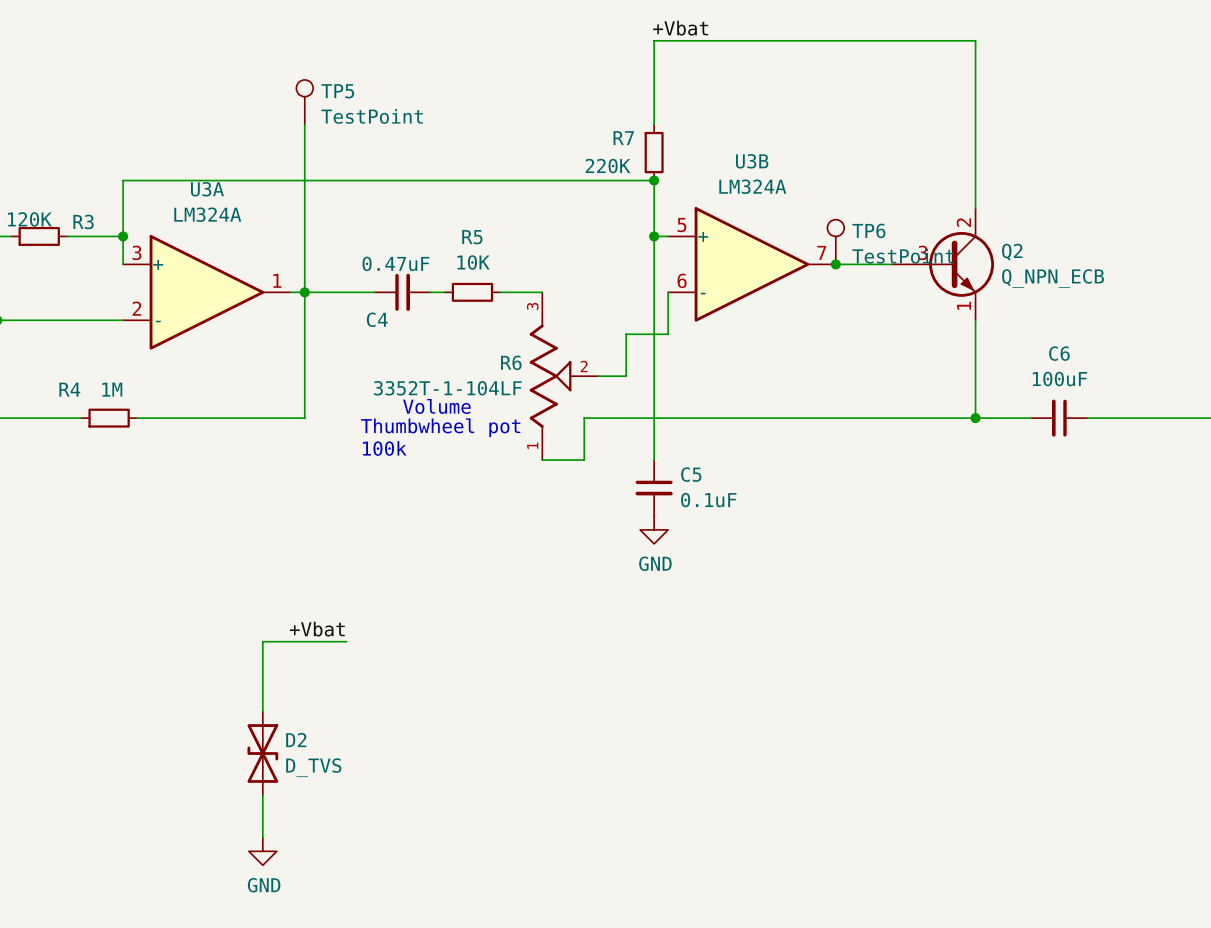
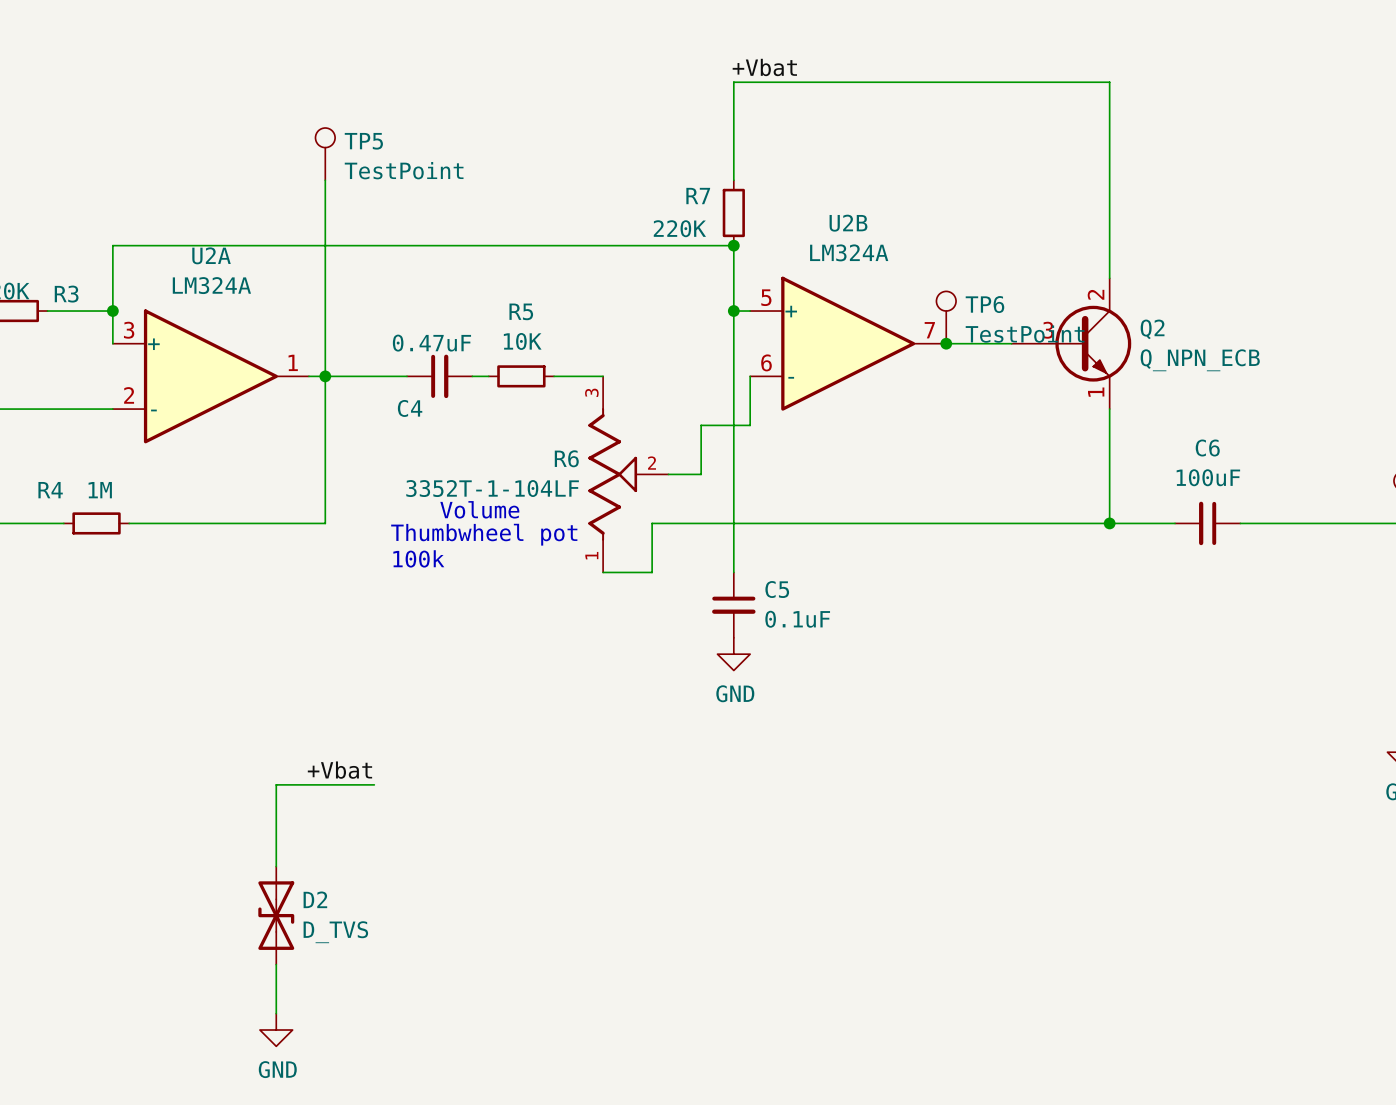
U3B name: U3B (752, 161) -> U2B (848, 223)
U3A name: U3A (207, 189) -> U2A (211, 255)

